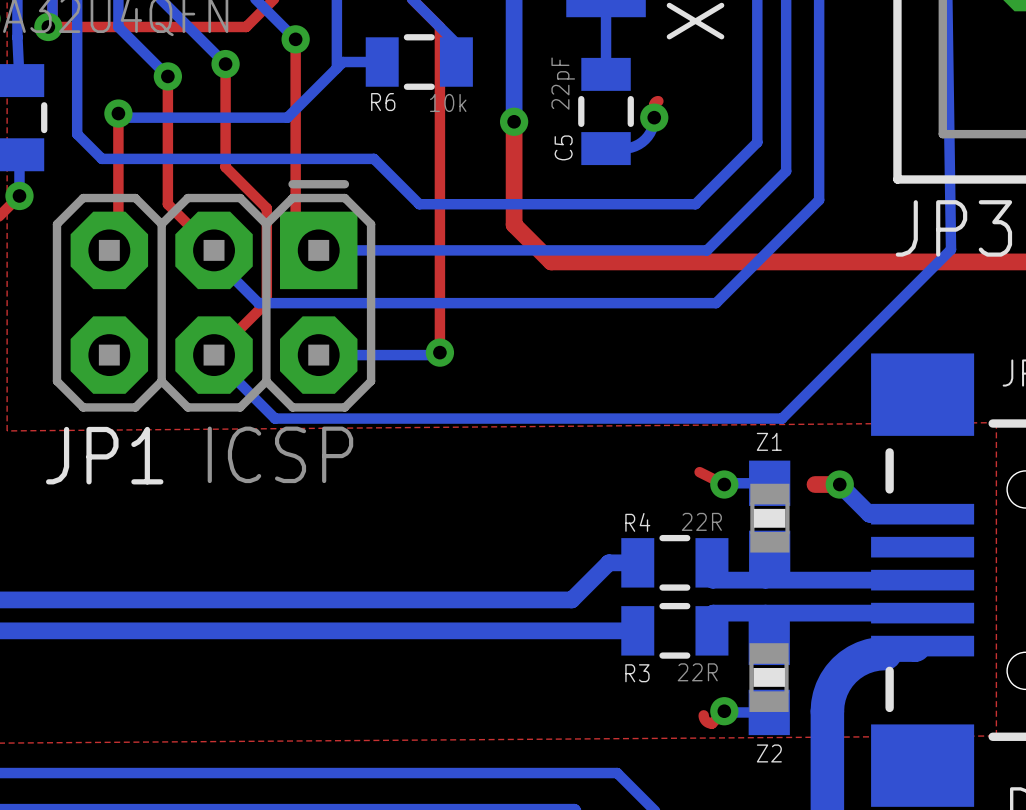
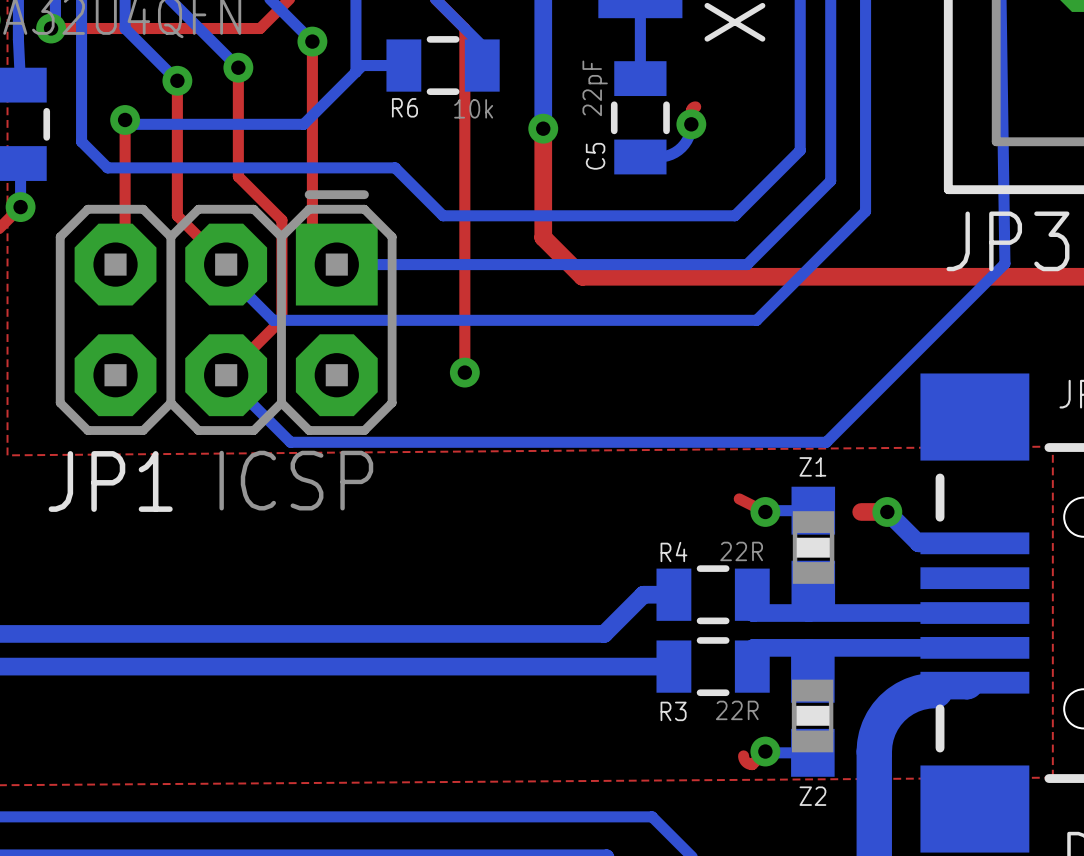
bottom track: (437, 355) (318, 355) -> none

